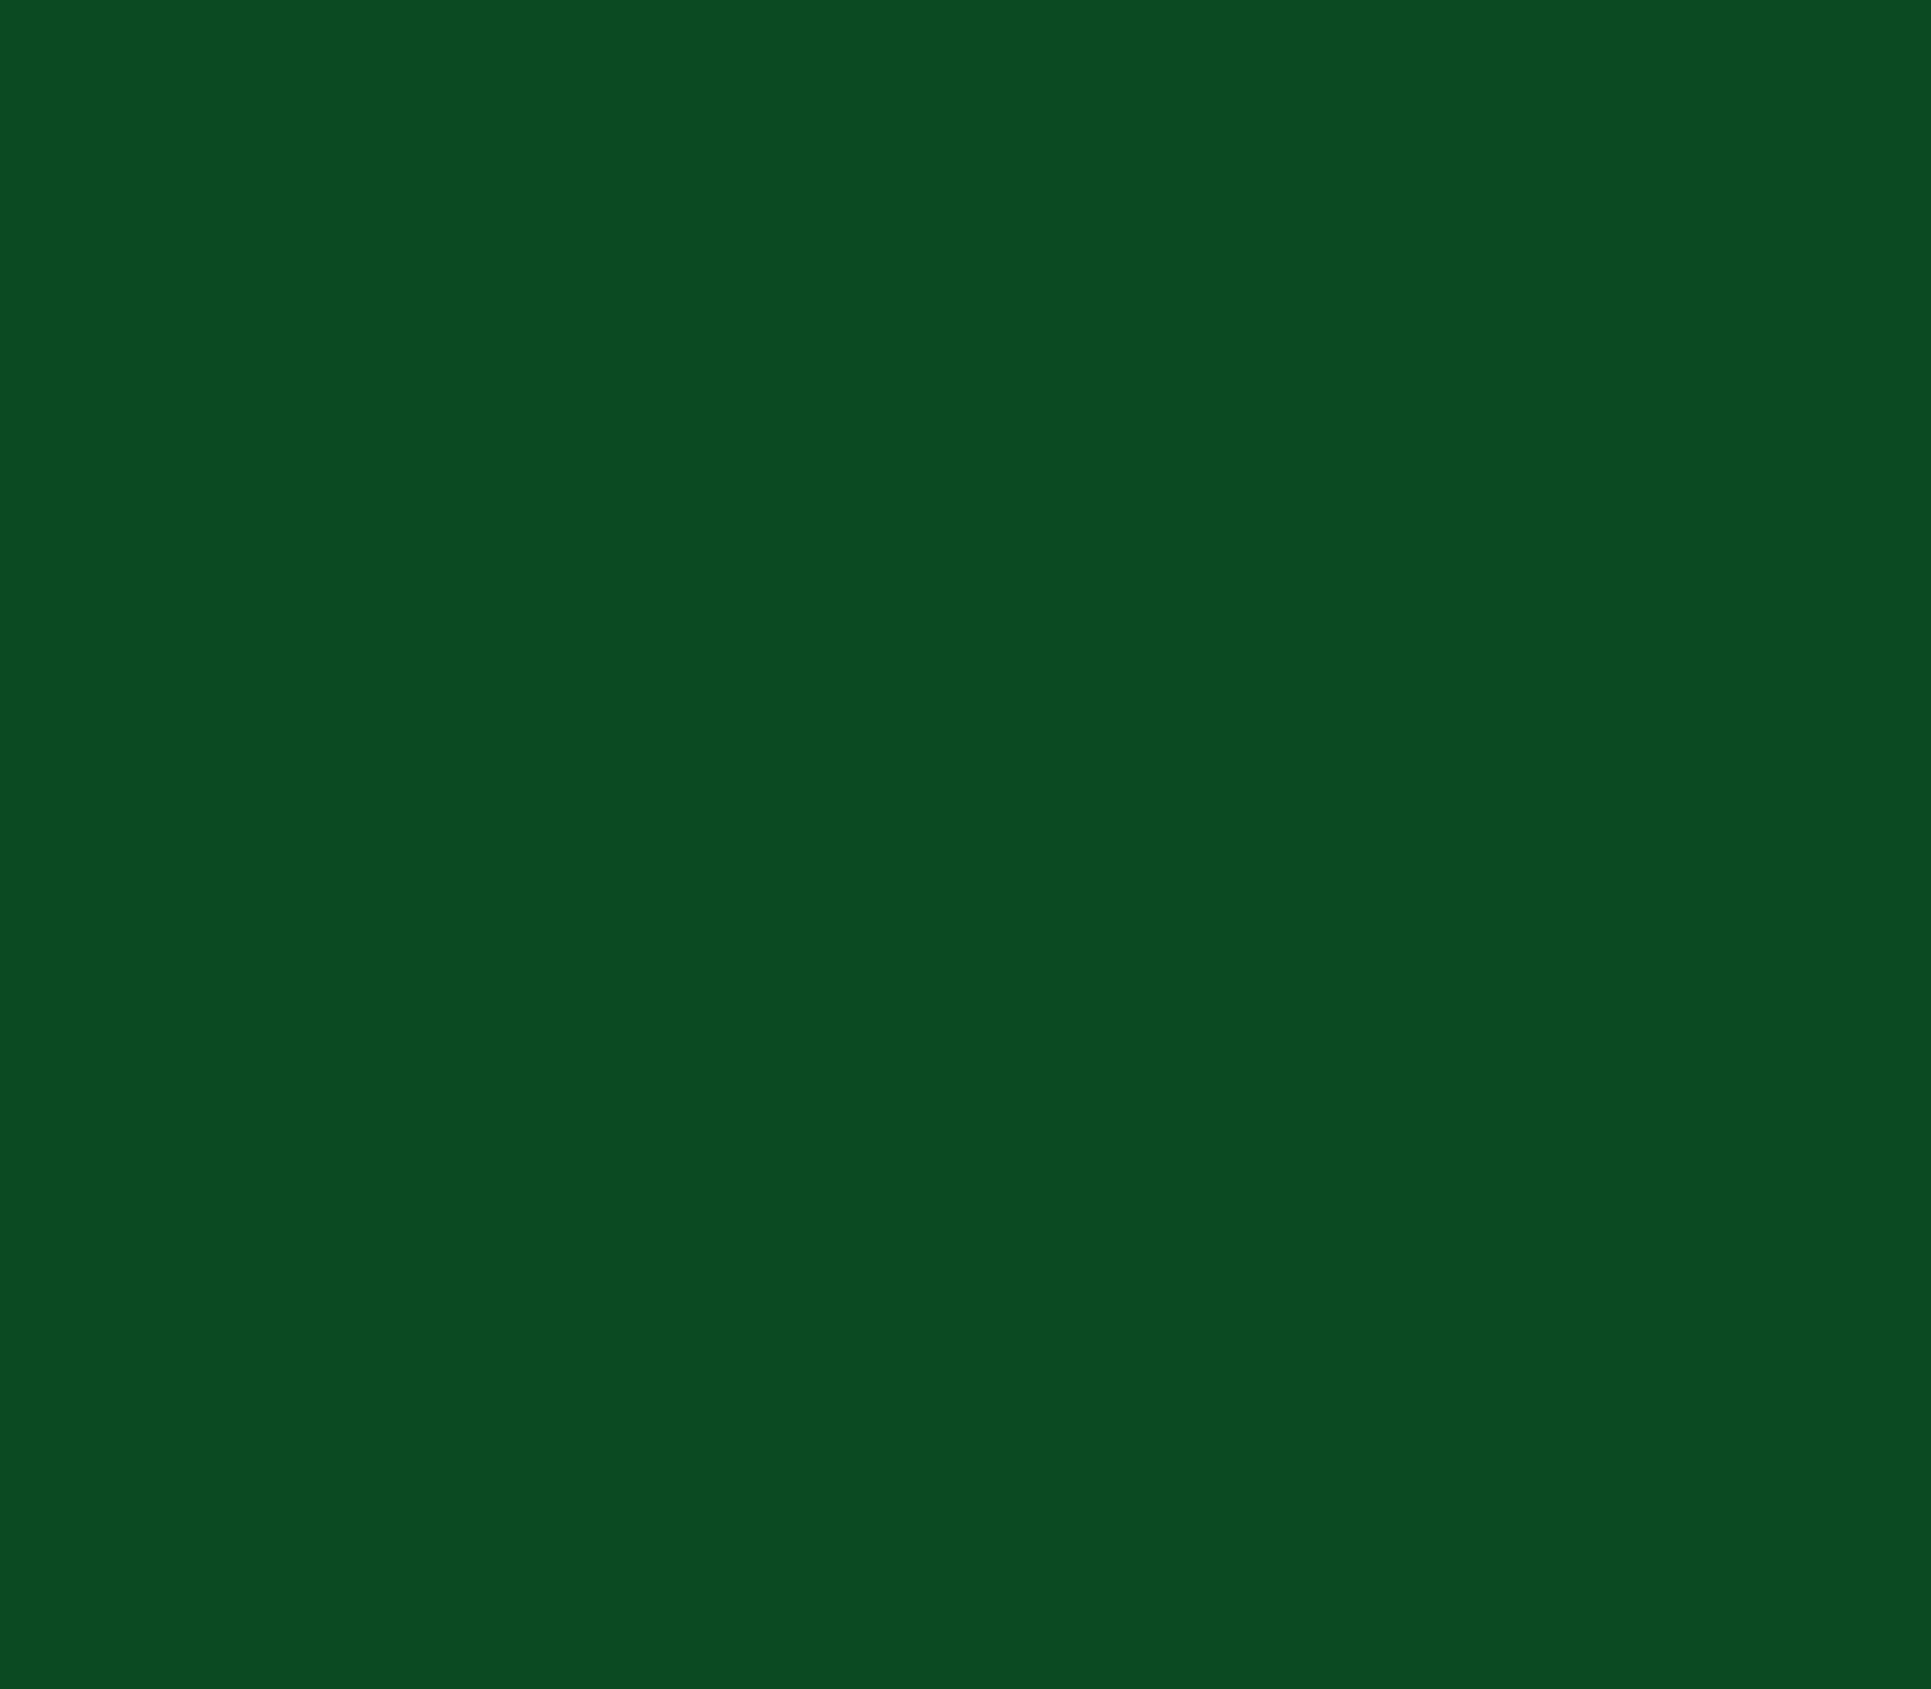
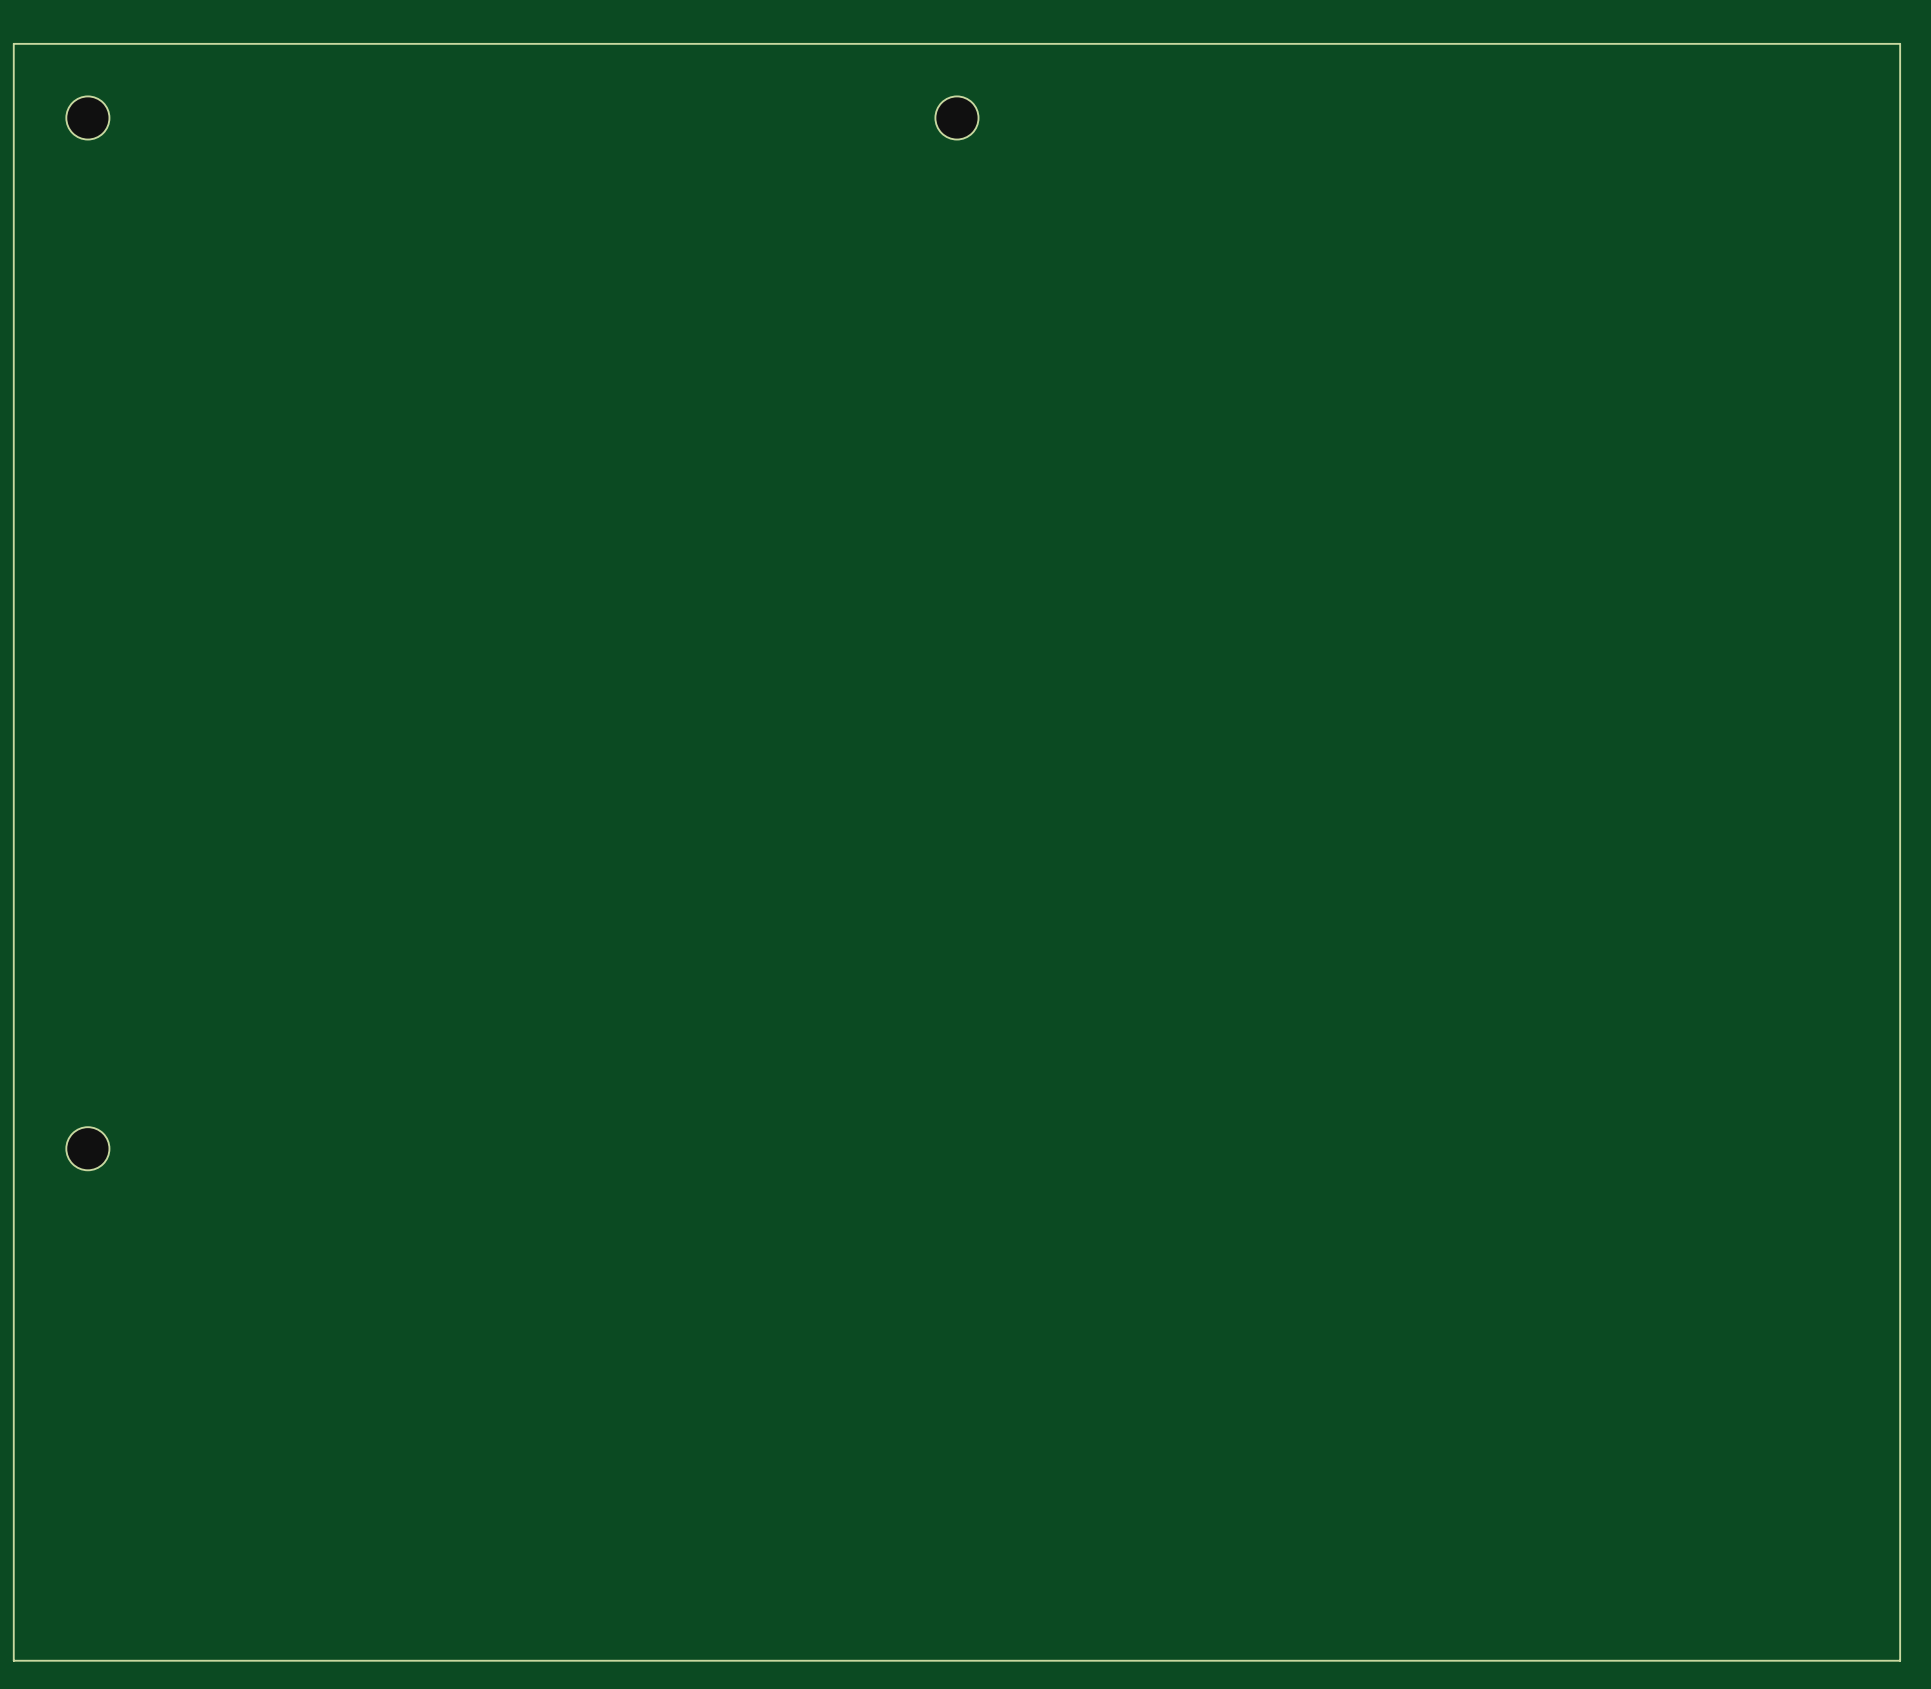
board edge: none -> (1900, 43) (13, 43) (13, 1660) (1900, 1660) (1900, 43)
part: none -> (87, 117)
part: none -> (956, 117)
part: none -> (87, 1148)

